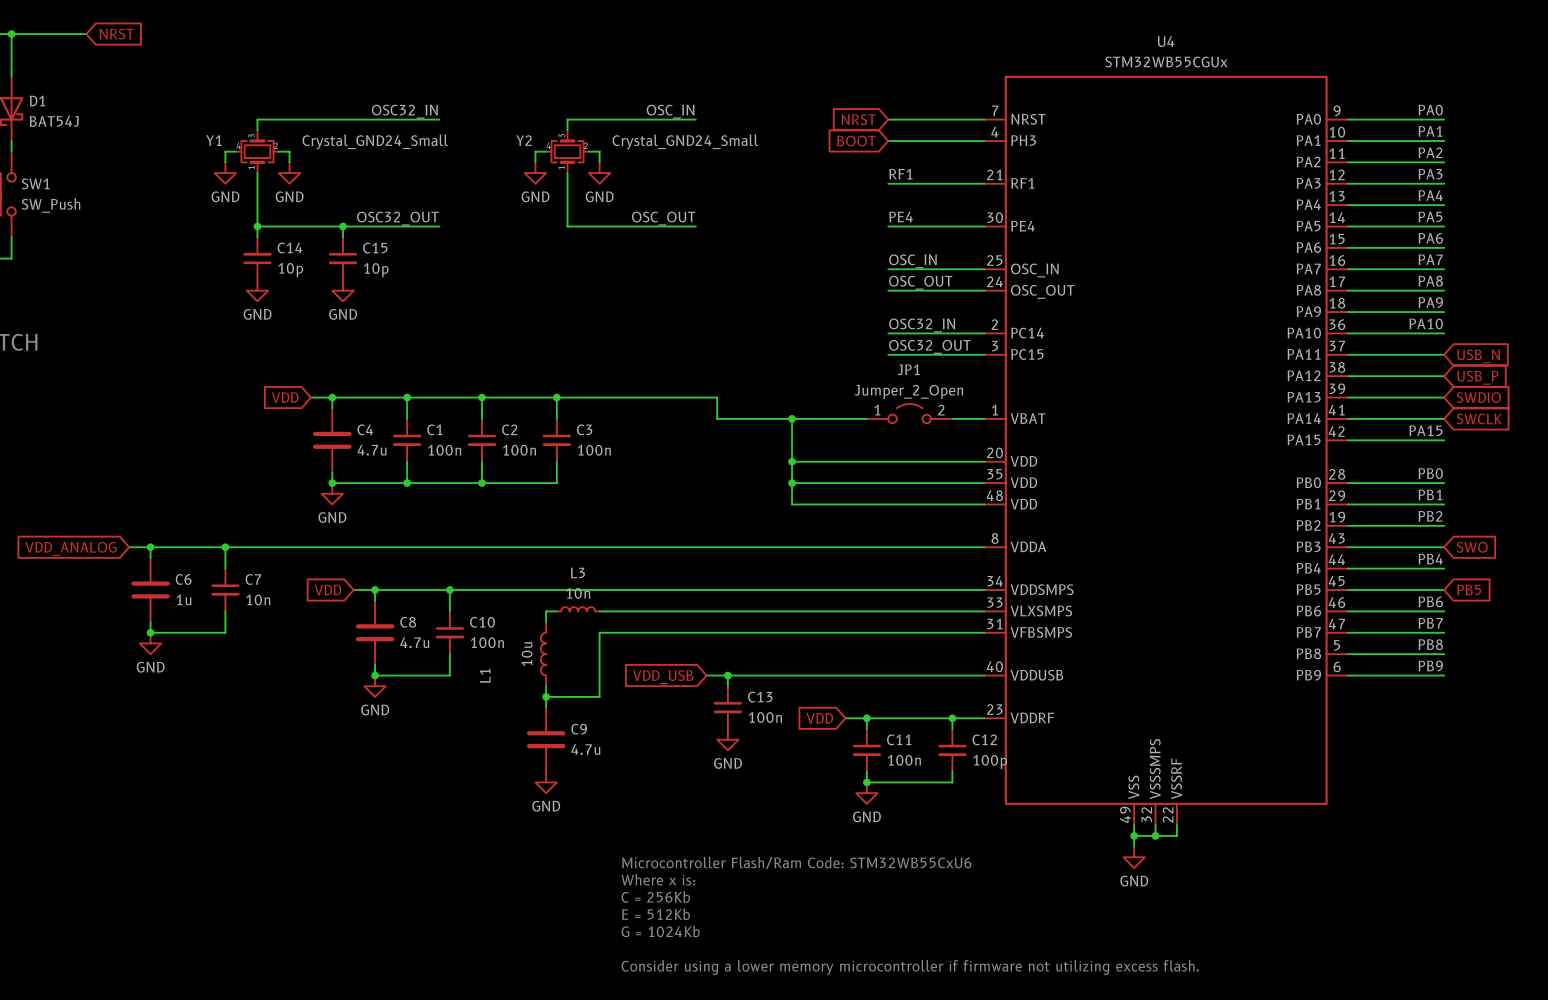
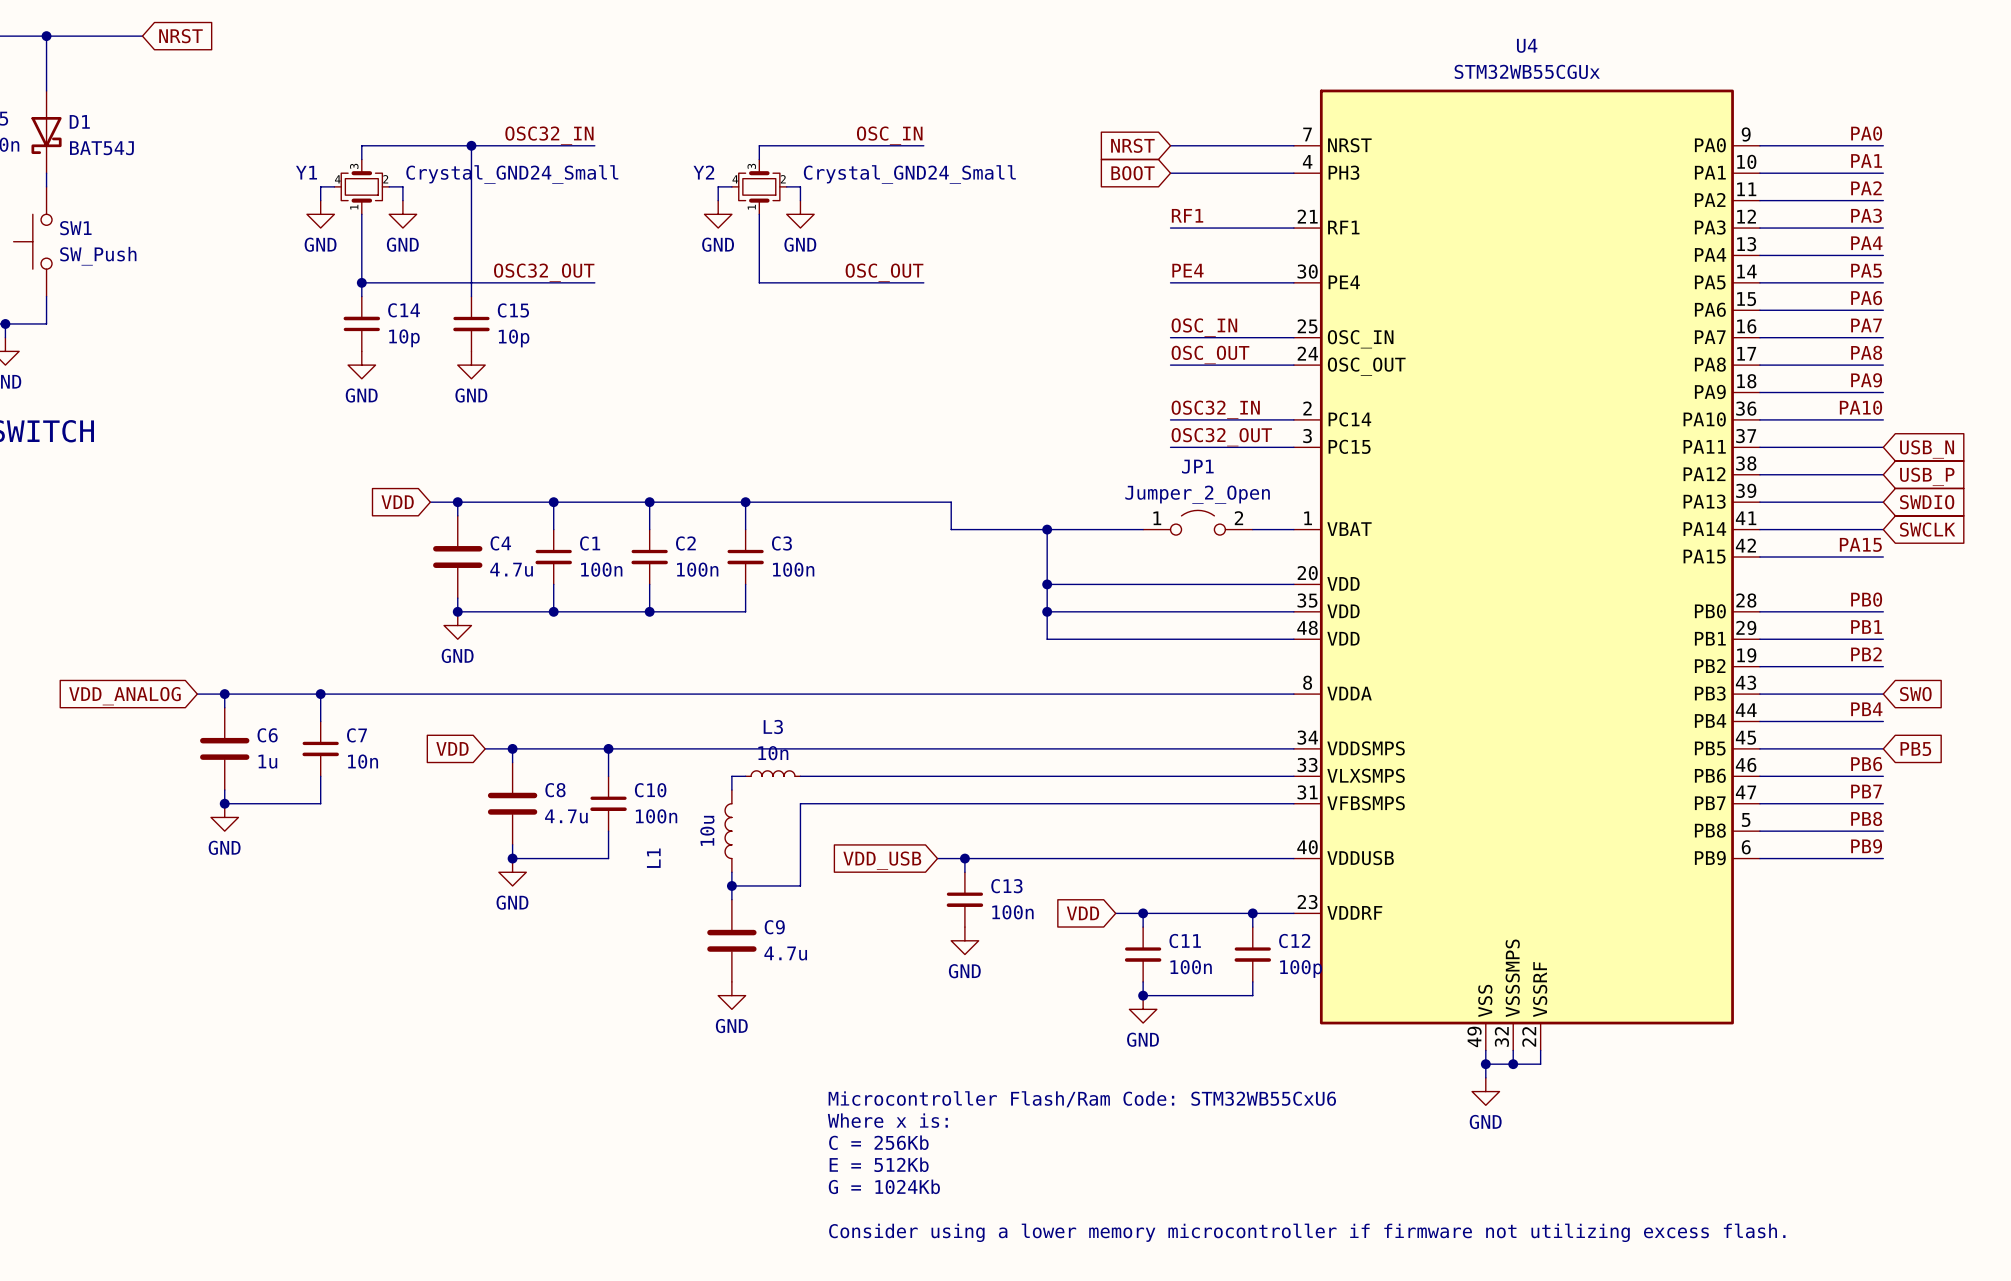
wire: none -> (471, 145) (471, 282)
junction: none -> (471, 145)
junction: (343, 226) -> none

